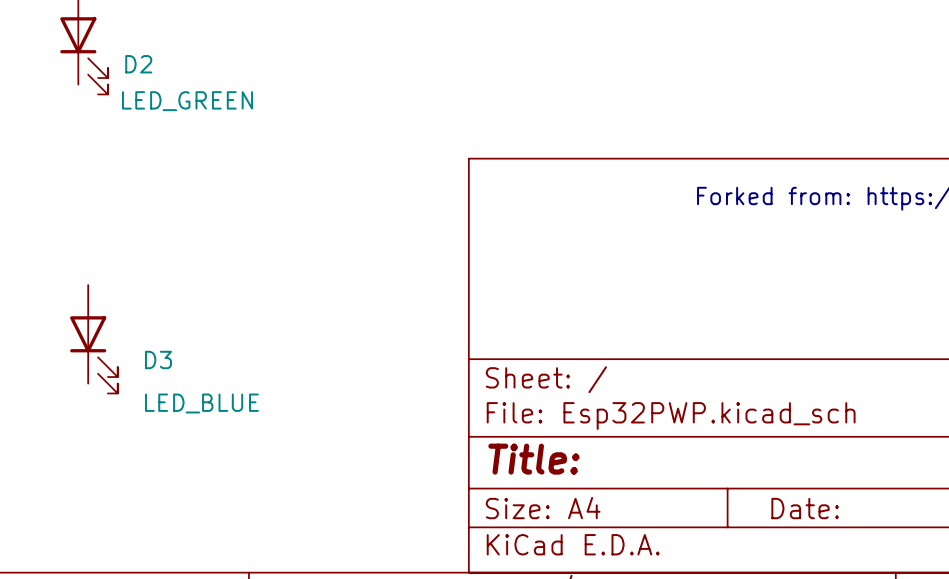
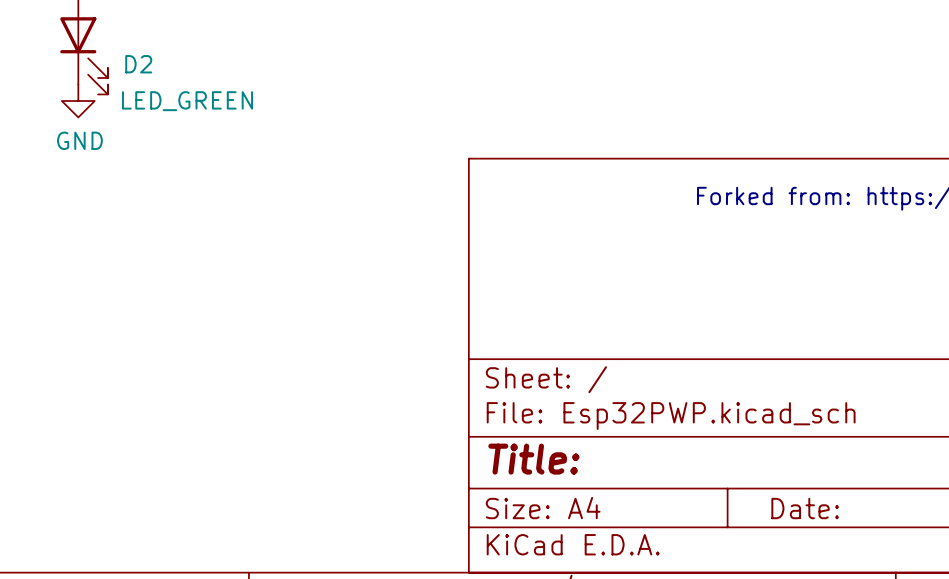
power symbol: none -> GND (78, 101)
D3: LED_BLUE (93, 339) -> none

